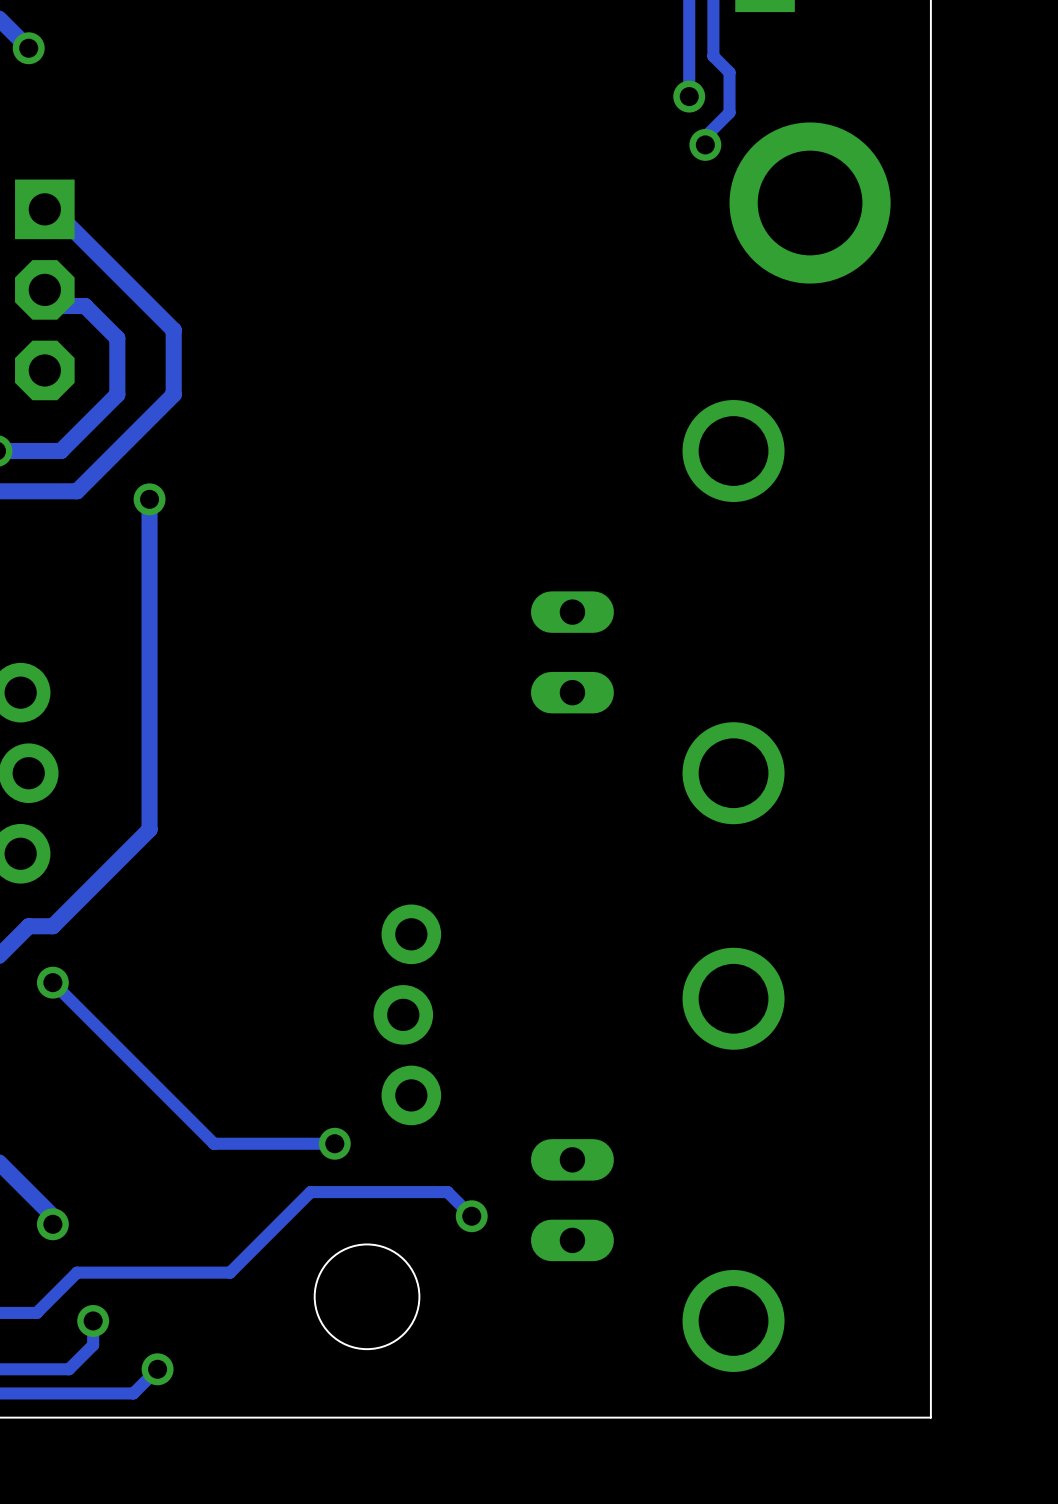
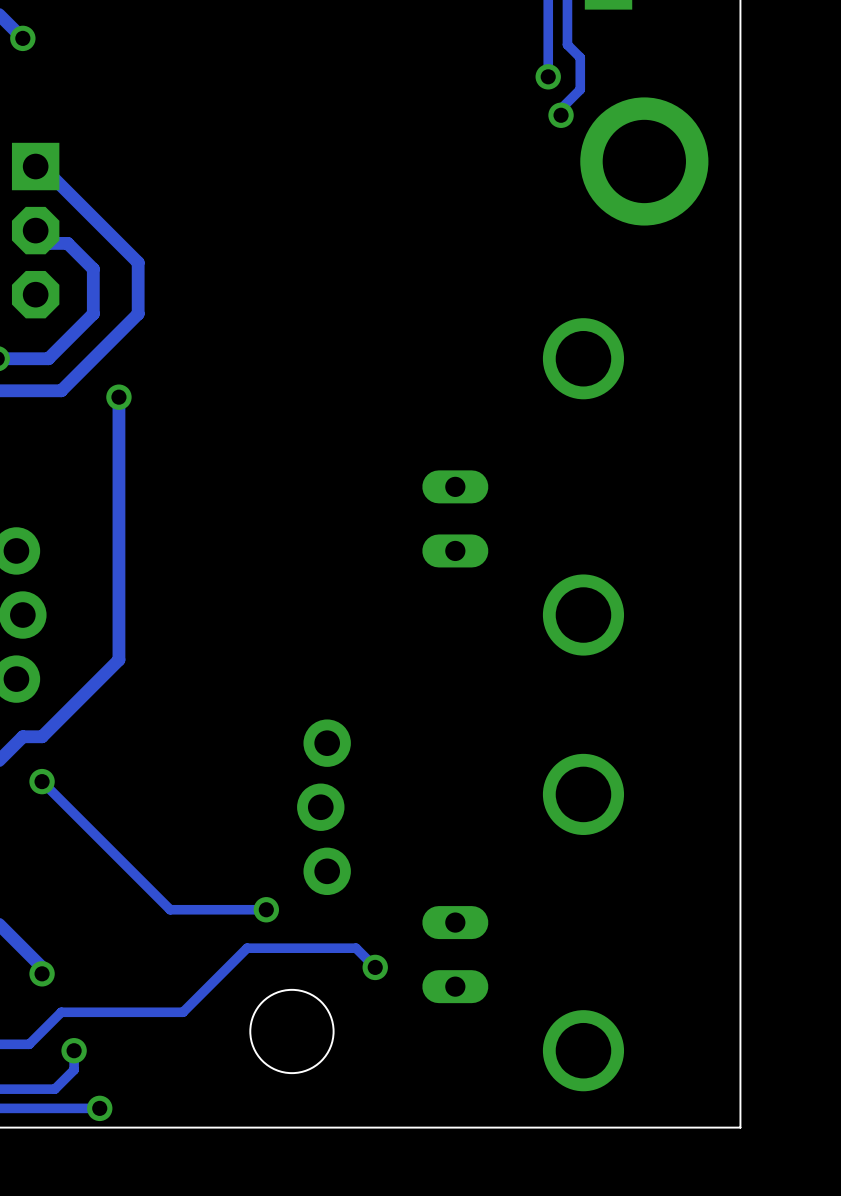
track: (157, 1369) (133, 1393) (125, 1393) -> none
via position: (157, 1369) -> (99, 1108)

